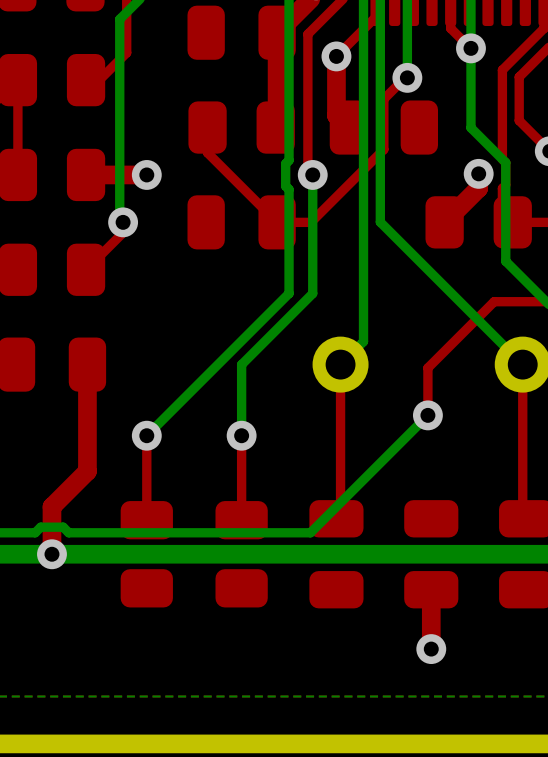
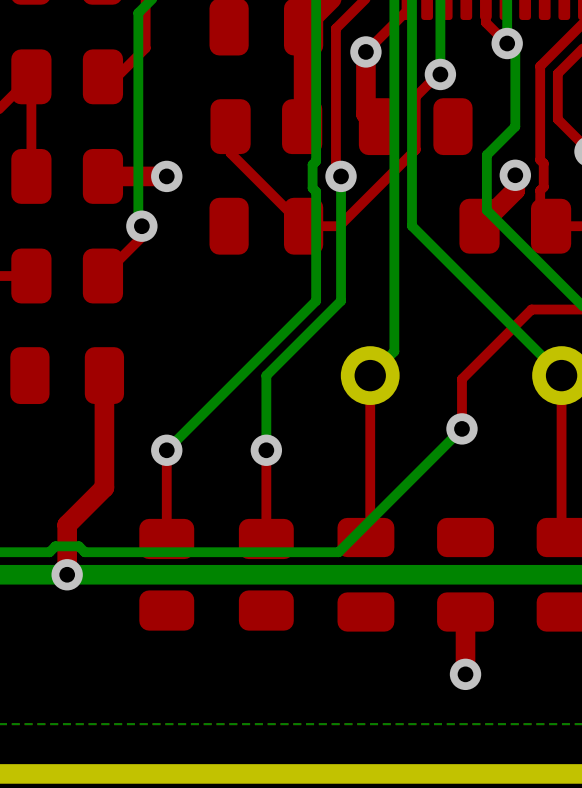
bottom track: (470, 48) (470, 127) (505, 162) (505, 261) -> (507, 43) (515, 51) (515, 126) (486, 155) (486, 210) (543, 267)

